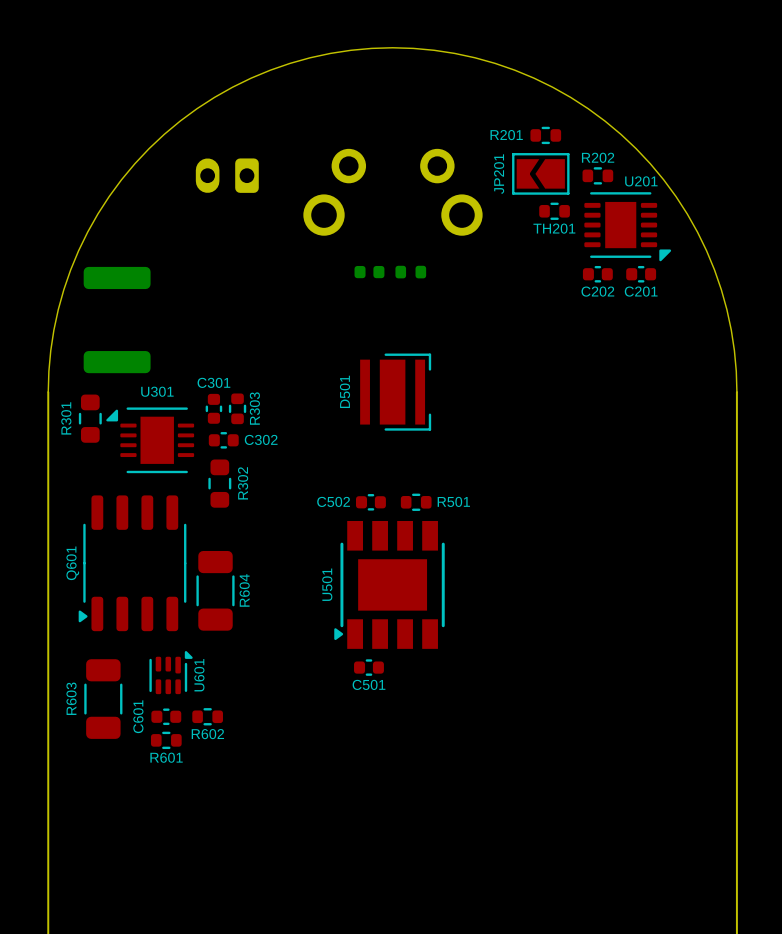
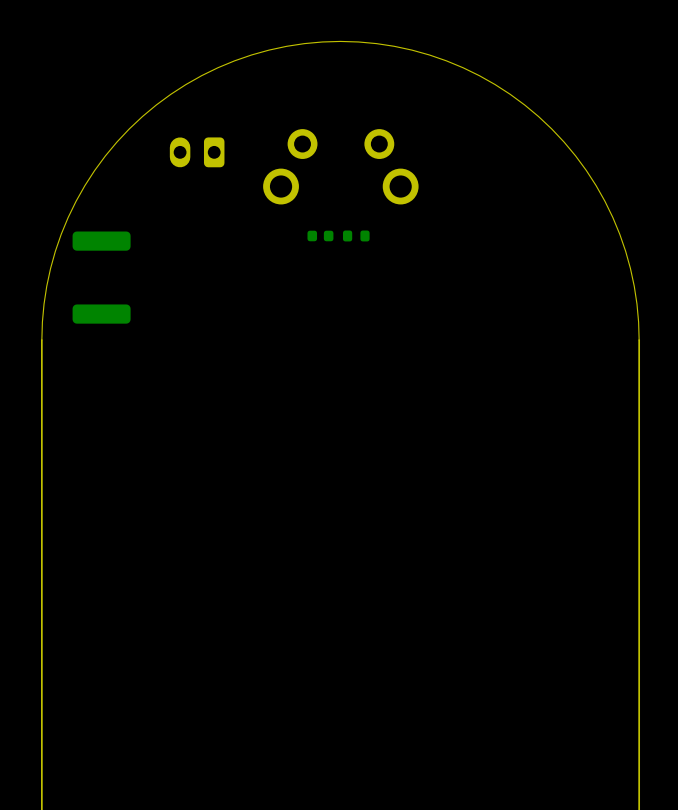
R201: (545, 135) -> none
JP201: (540, 173) -> none
R202: (597, 175) -> none
TH201: (554, 211) -> none
U201: (627, 226) -> none
C202: (597, 274) -> none
C201: (641, 274) -> none
D501: (395, 392) -> none
C301: (213, 408) -> none
R303: (237, 408) -> none
R301: (90, 418) -> none
U301: (150, 440) -> none
C302: (223, 440) -> none
R302: (219, 483) -> none
C502: (370, 502) -> none
R501: (416, 502) -> none
Q601: (132, 563) -> none
U501: (389, 584) -> none
R604: (215, 590) -> none
C501: (368, 667) -> none
U601: (171, 672) -> none
R603: (103, 699) -> none
C601: (166, 716) -> none
R602: (207, 716) -> none
R601: (166, 740) -> none

